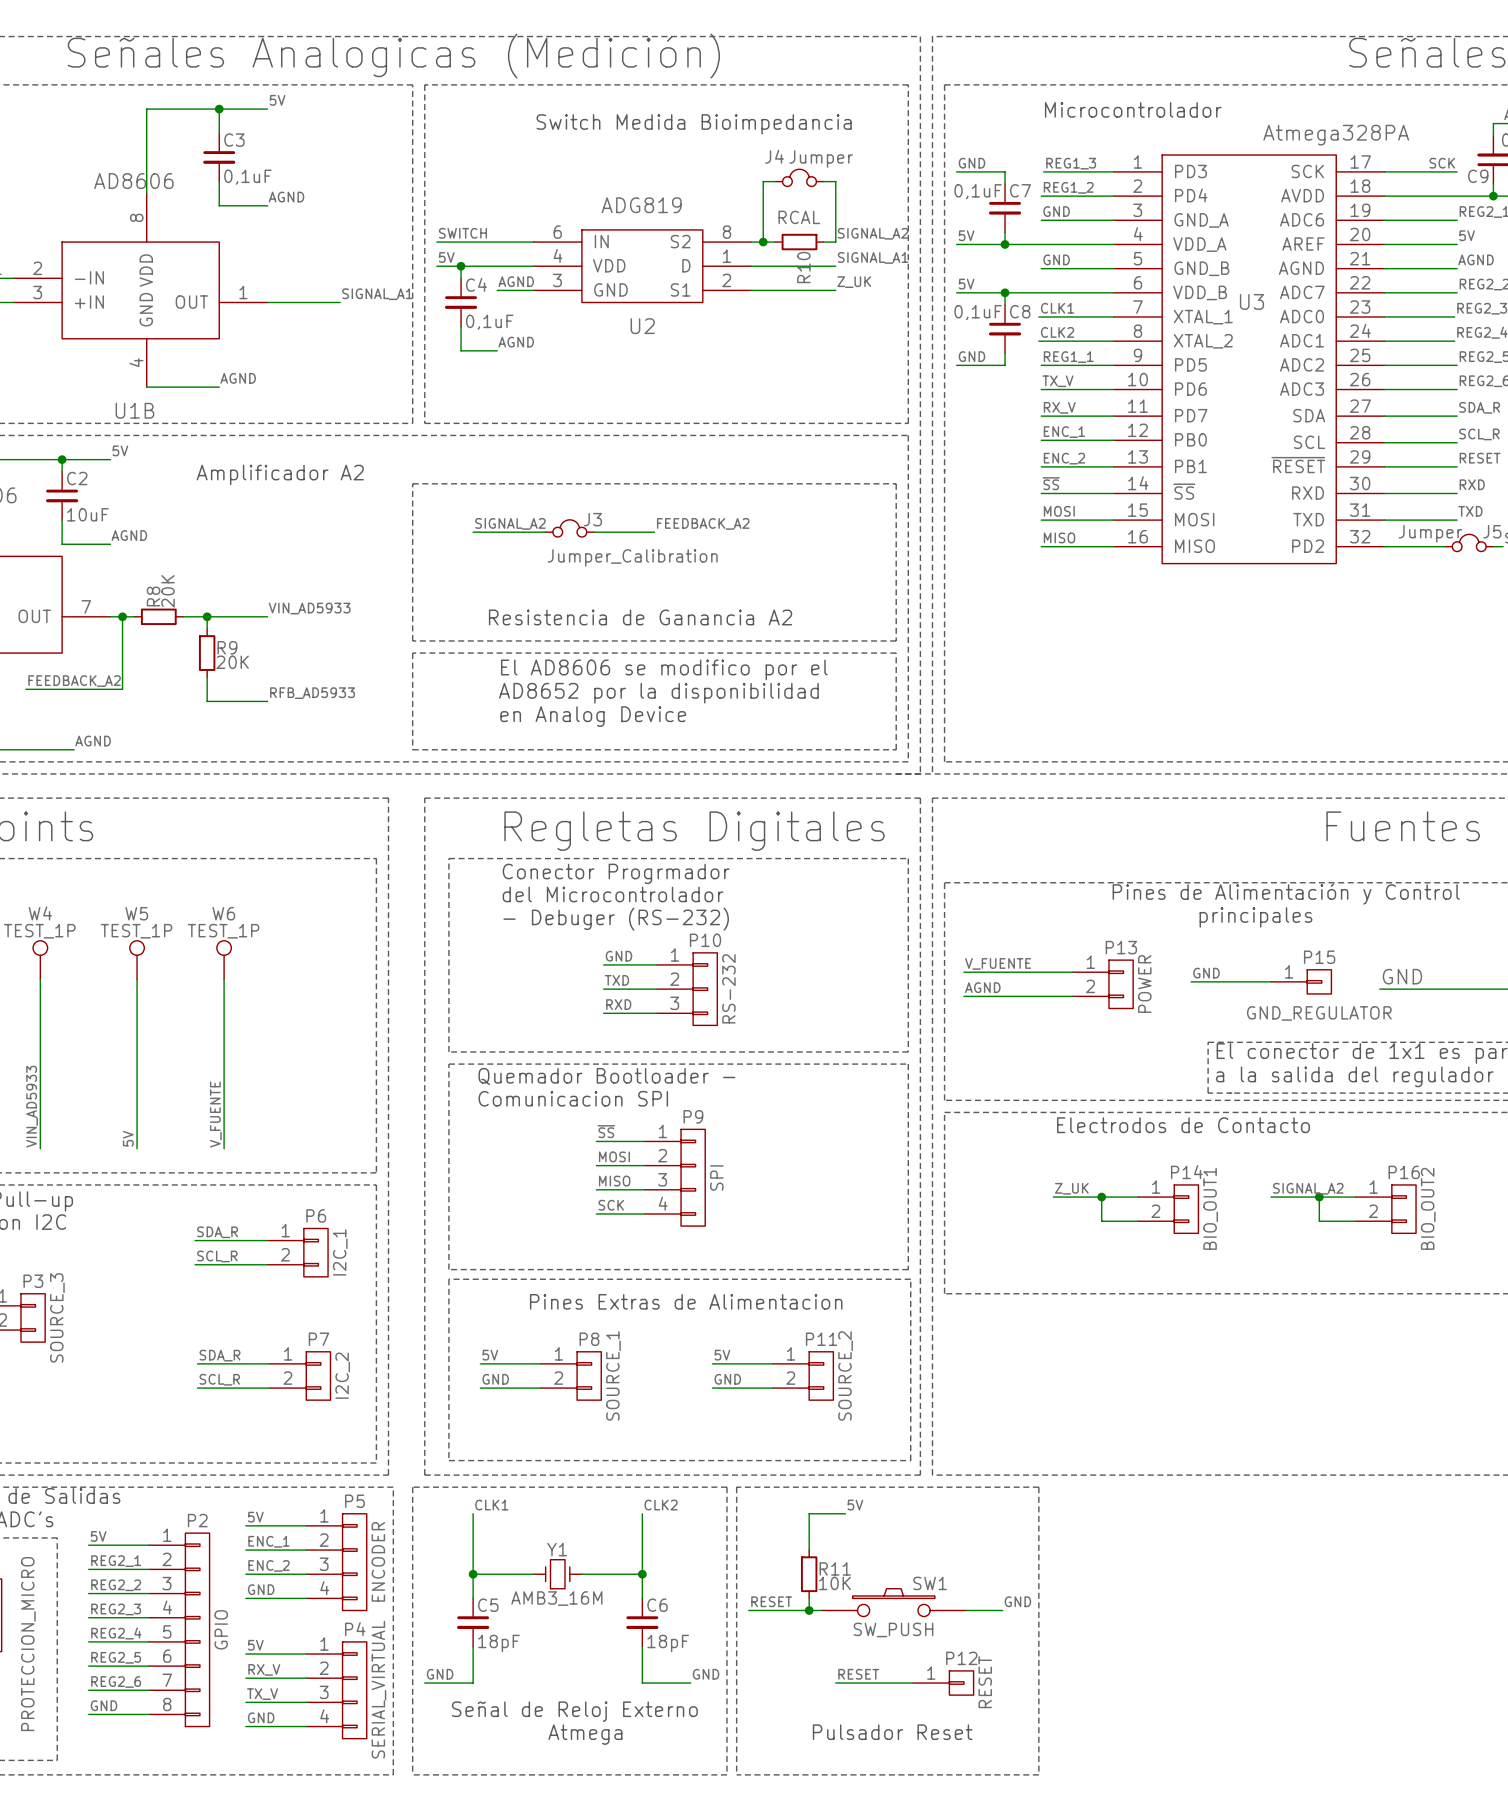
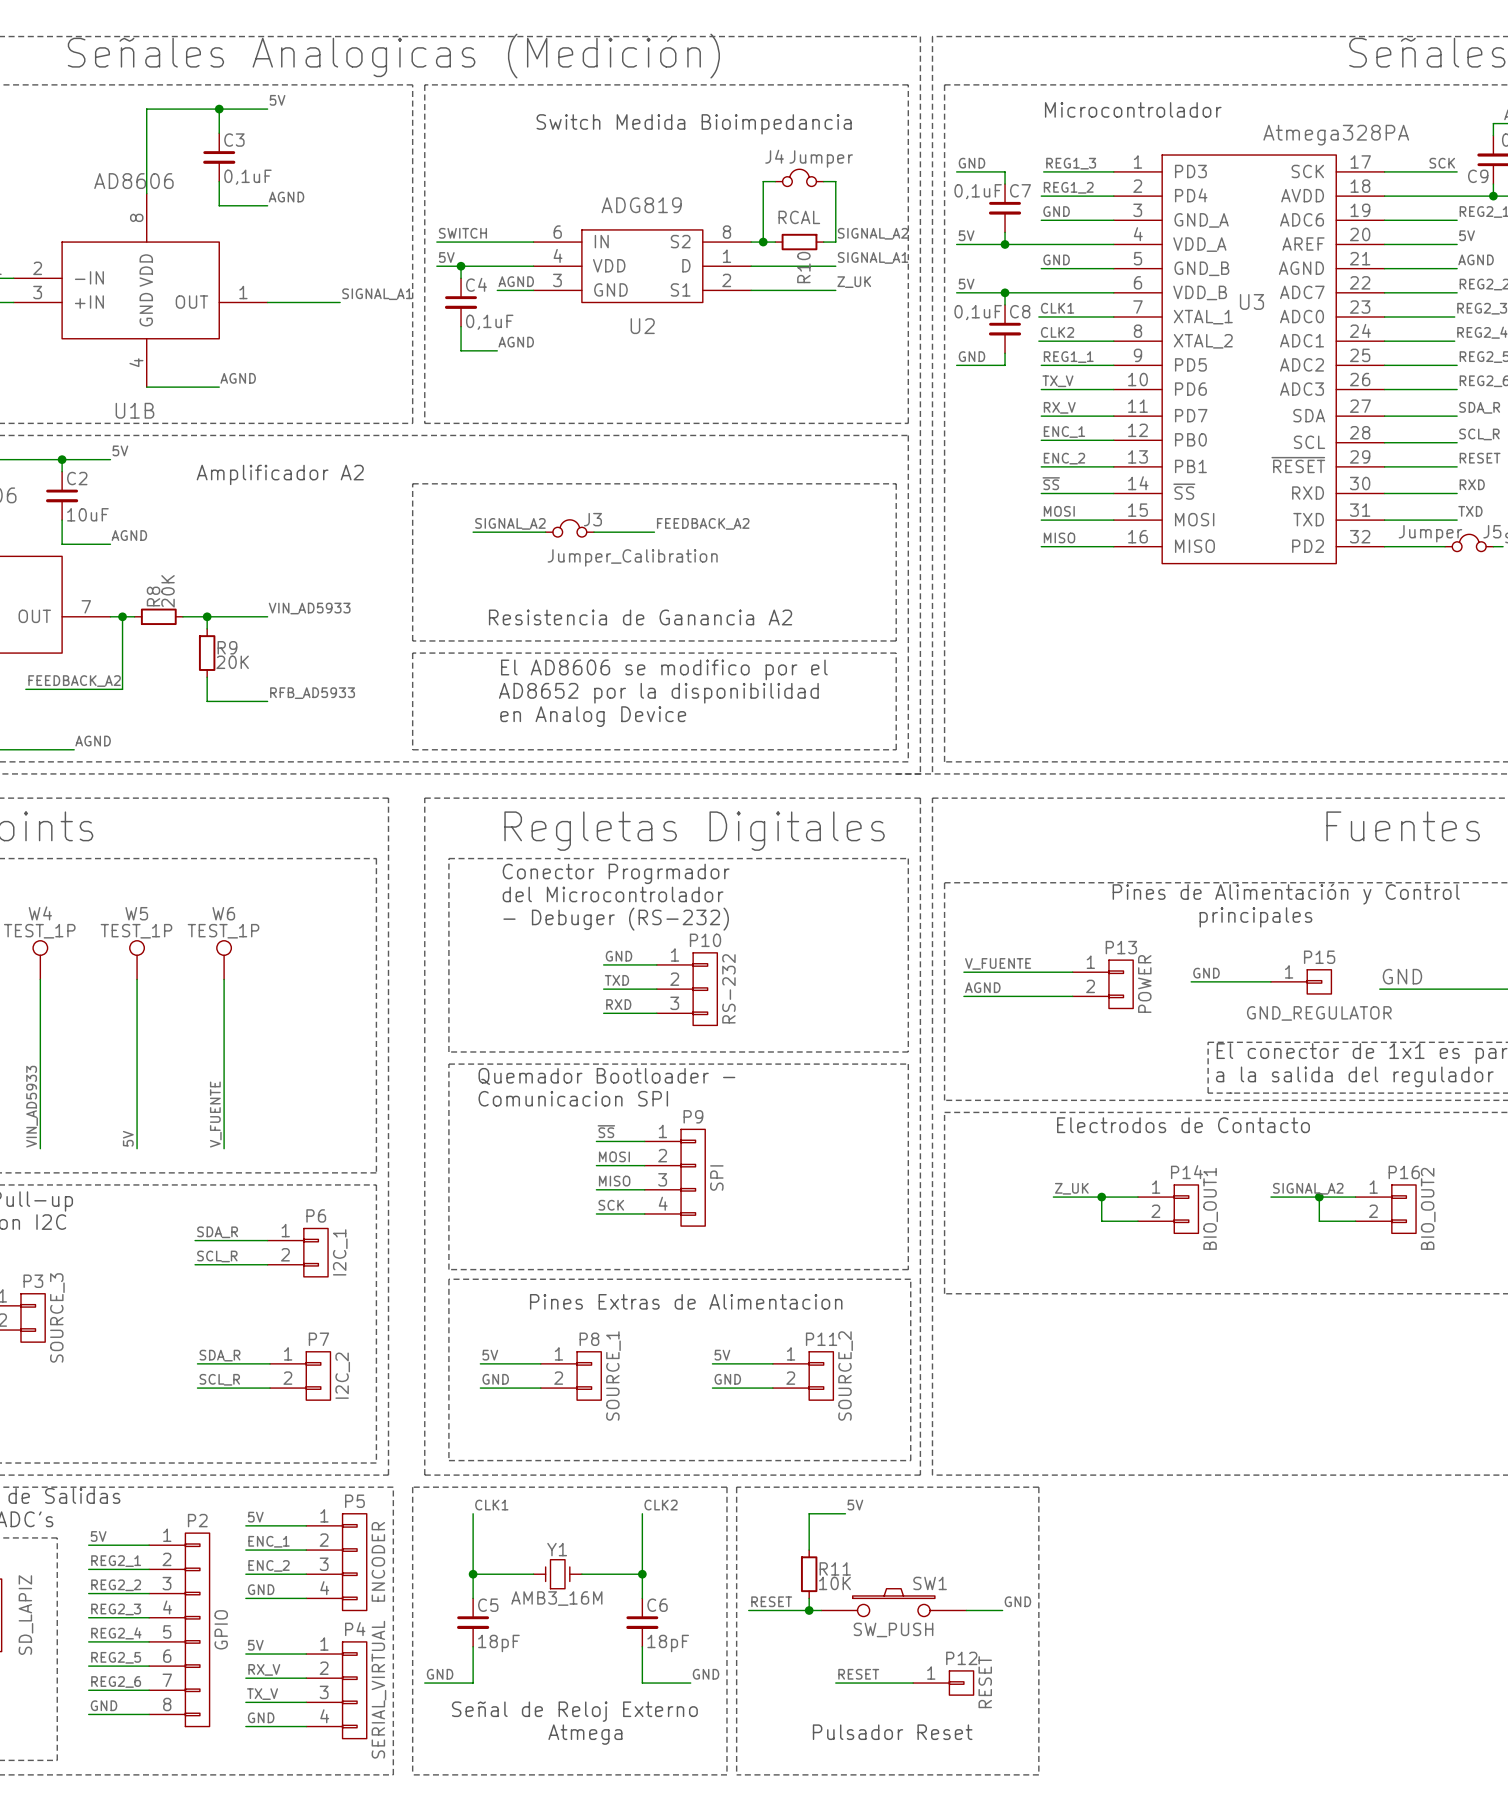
part value: PROTECCION_MICRO (28, 1644) -> SD_LAPIZ (25, 1615)

